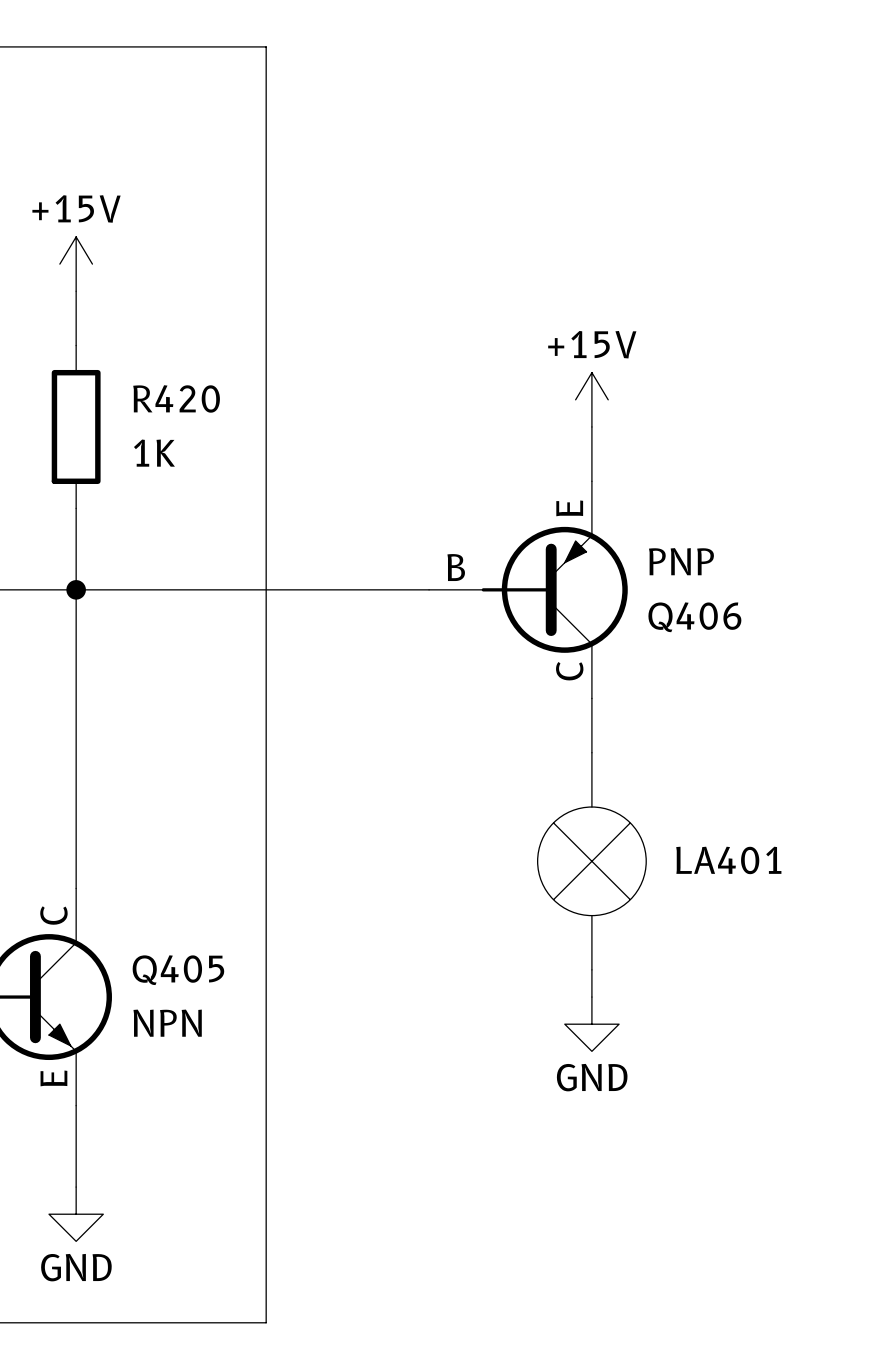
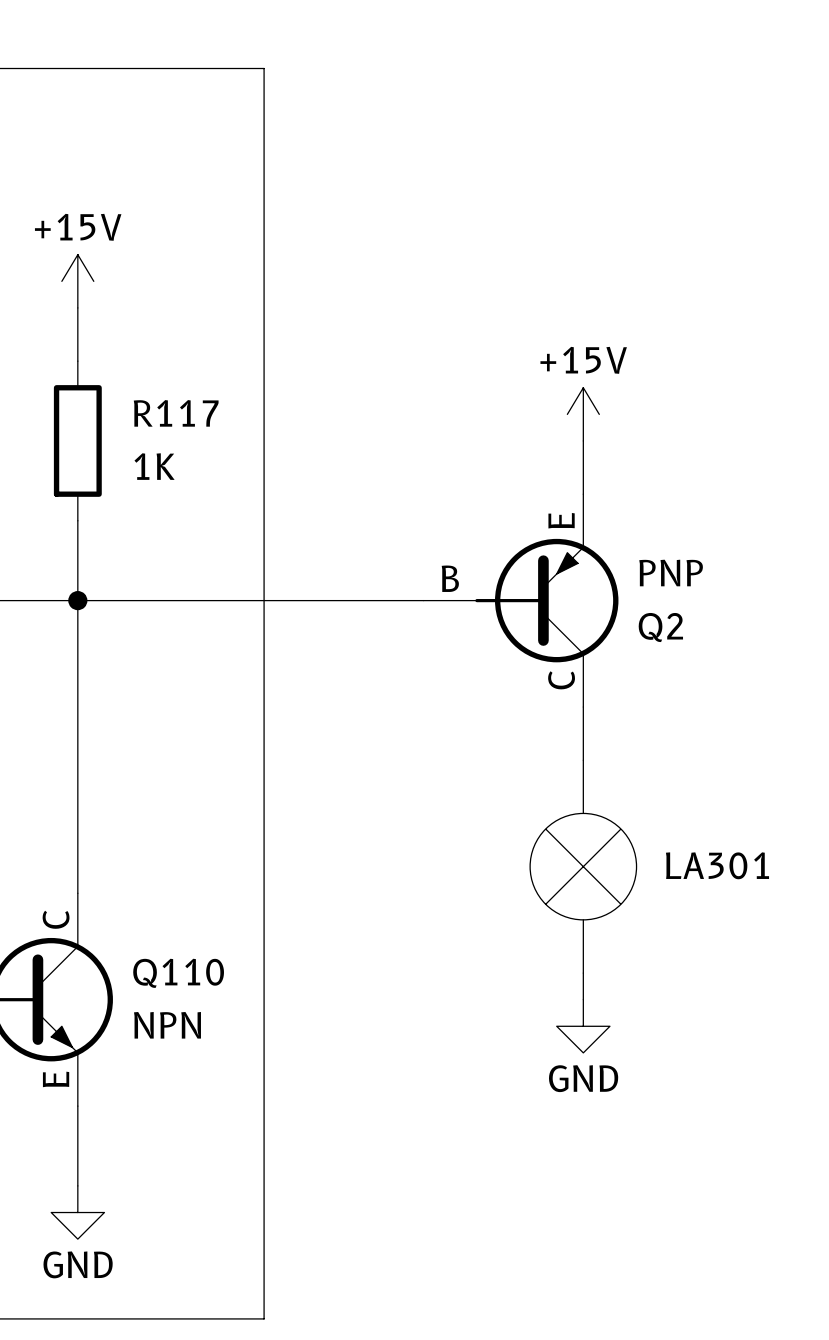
R420 name: R420 (176, 398) -> R117 (176, 413)
Q406 name: Q406 (694, 617) -> Q2 (660, 627)
LA401 name: LA401 (728, 860) -> LA301 (717, 865)
Q405 name: Q405 (178, 970) -> Q110 (178, 973)

